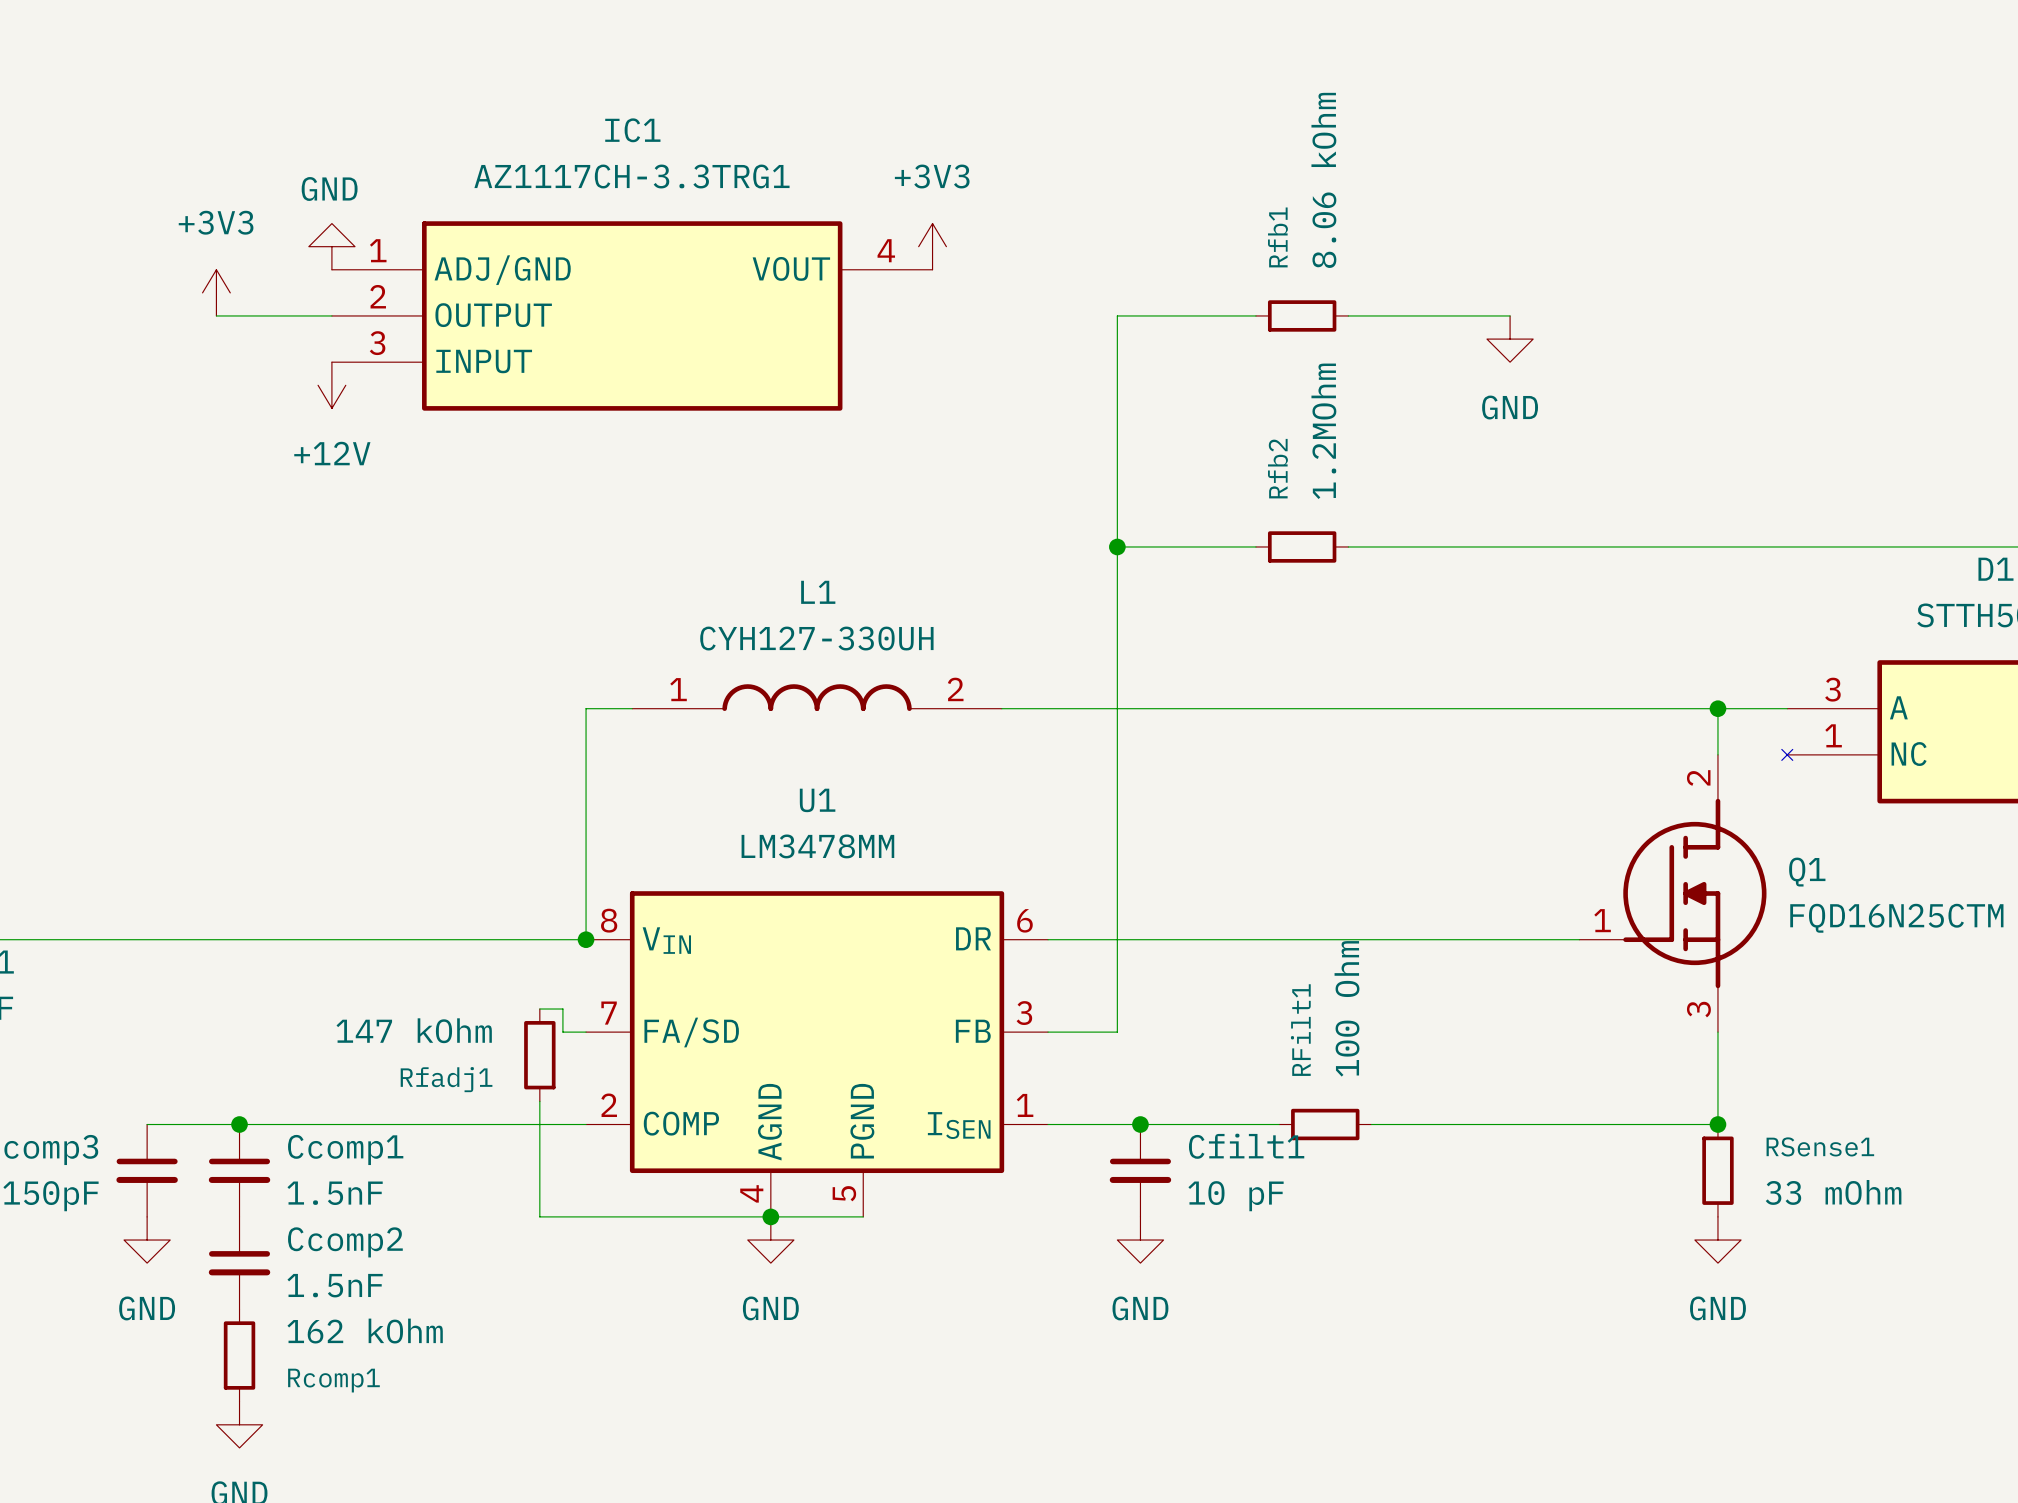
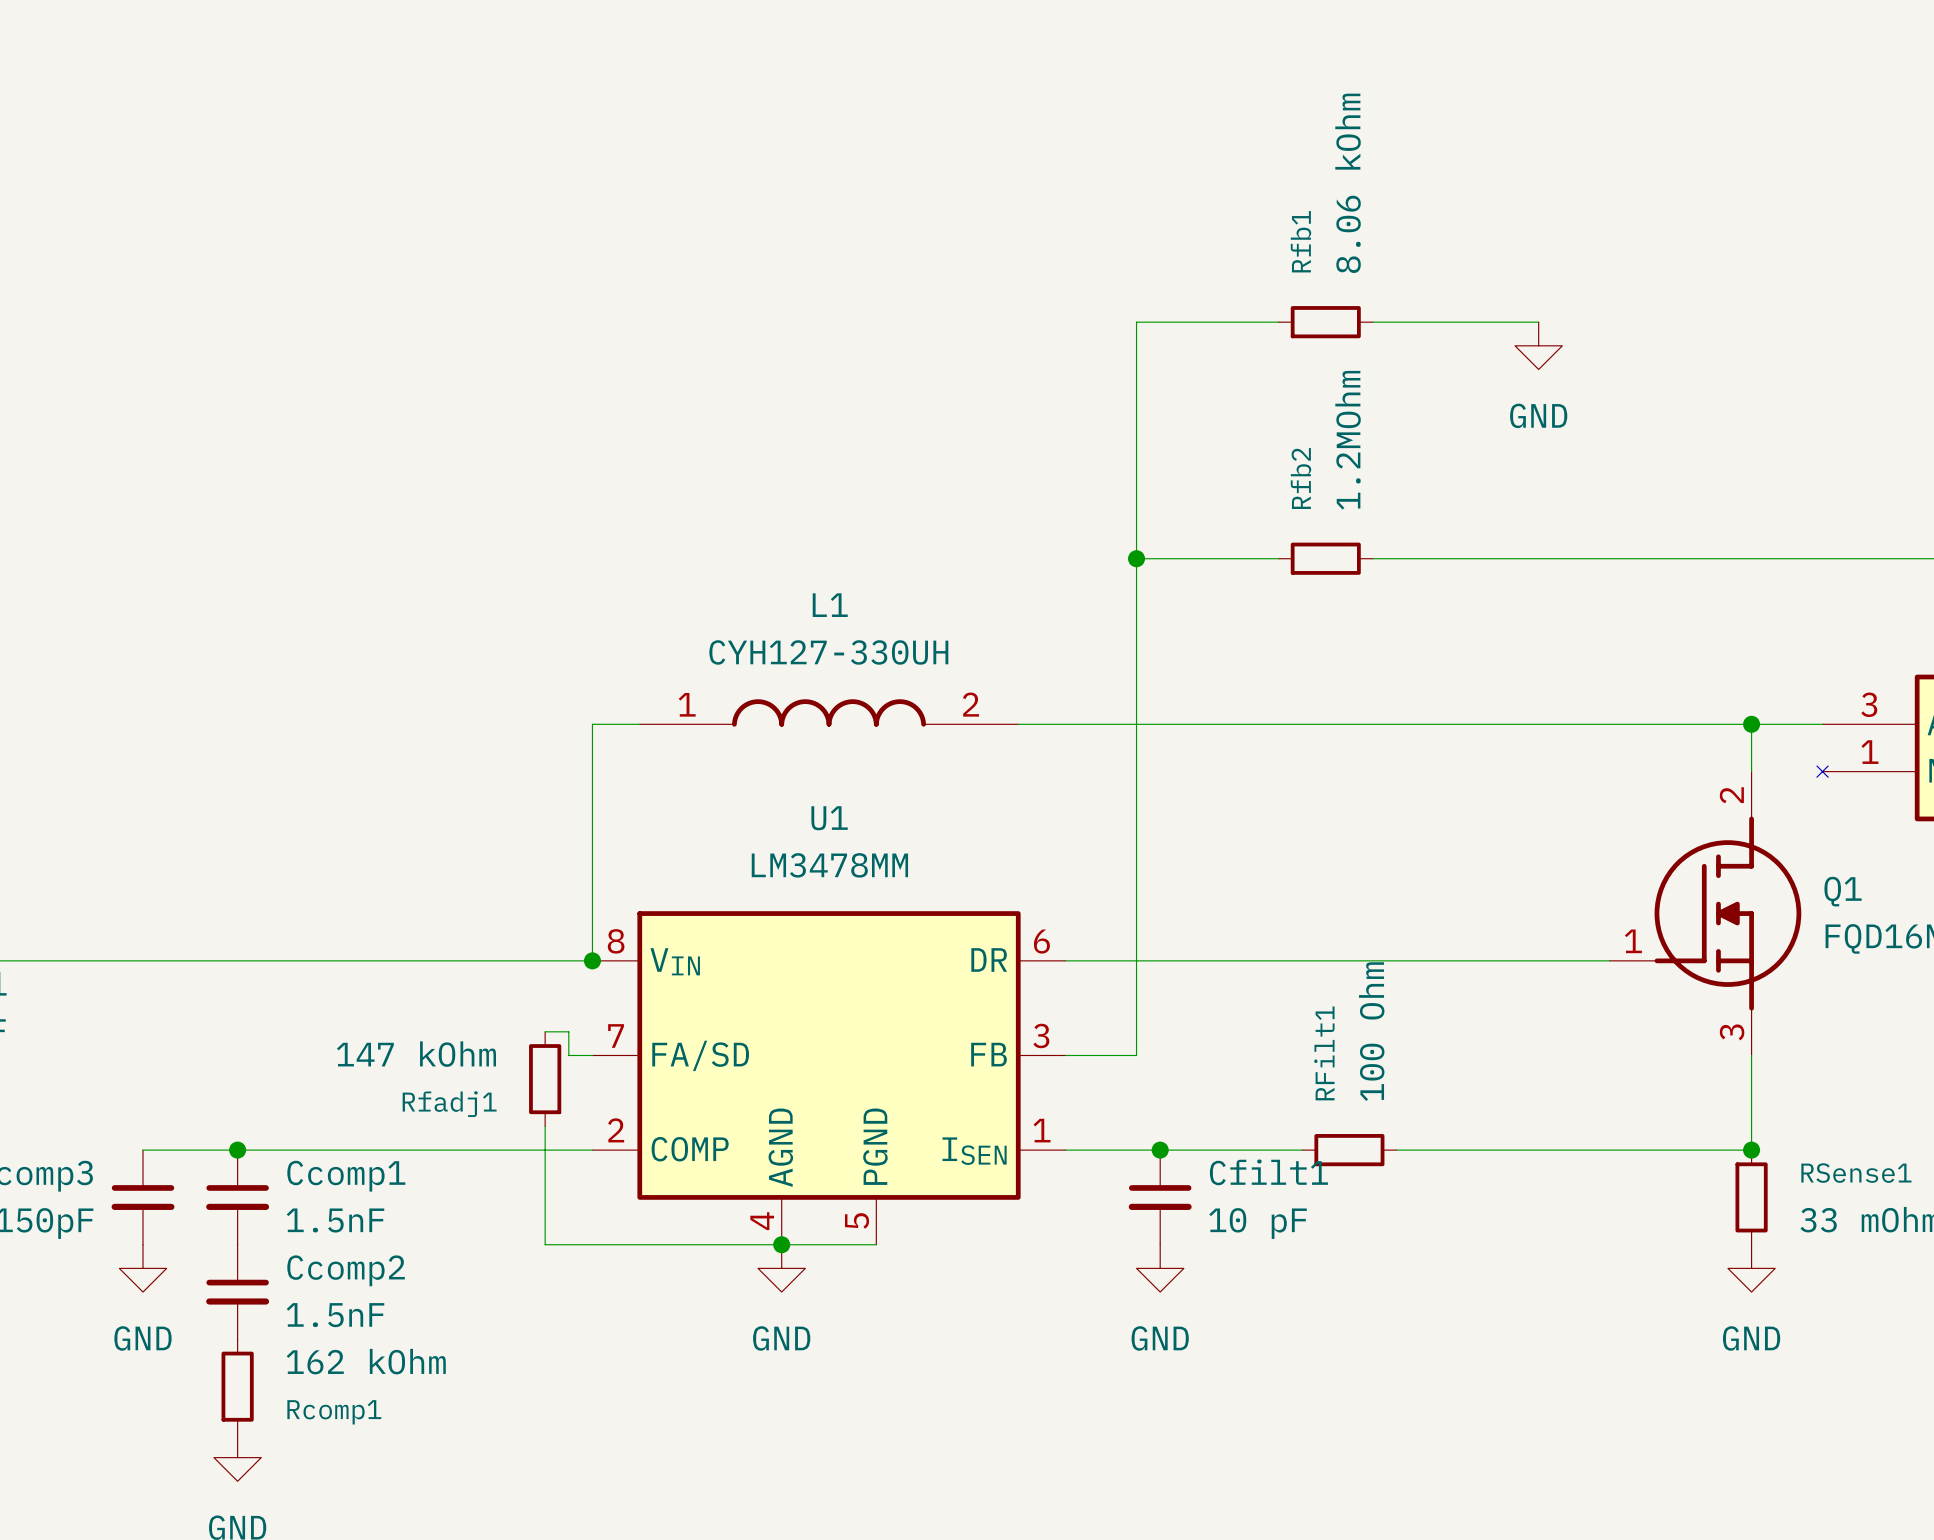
power symbol: GND (331, 246) -> none
power symbol: +3V3 (932, 246) -> none
power symbol: +3V3 (216, 292) -> none
wire: (216, 315) (331, 315) -> none
IC1: AZ1117CH-3.3TRG1 (632, 315) -> none
power symbol: +12V (331, 385) -> none

